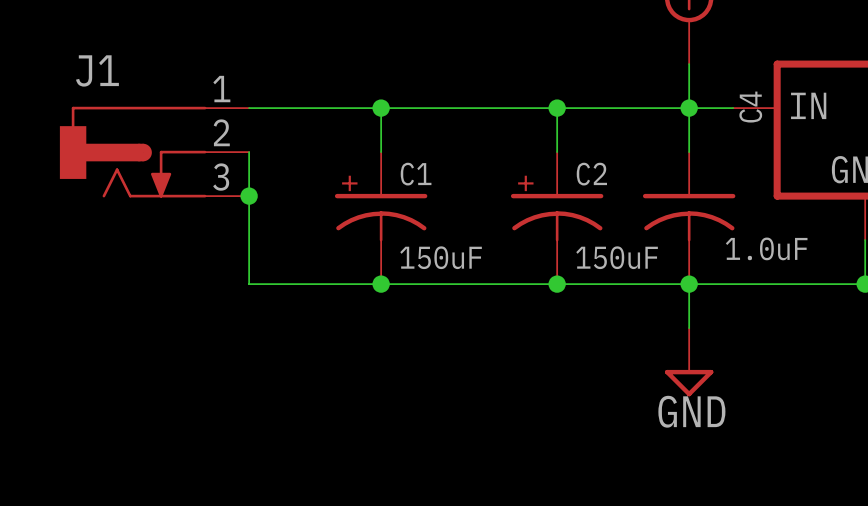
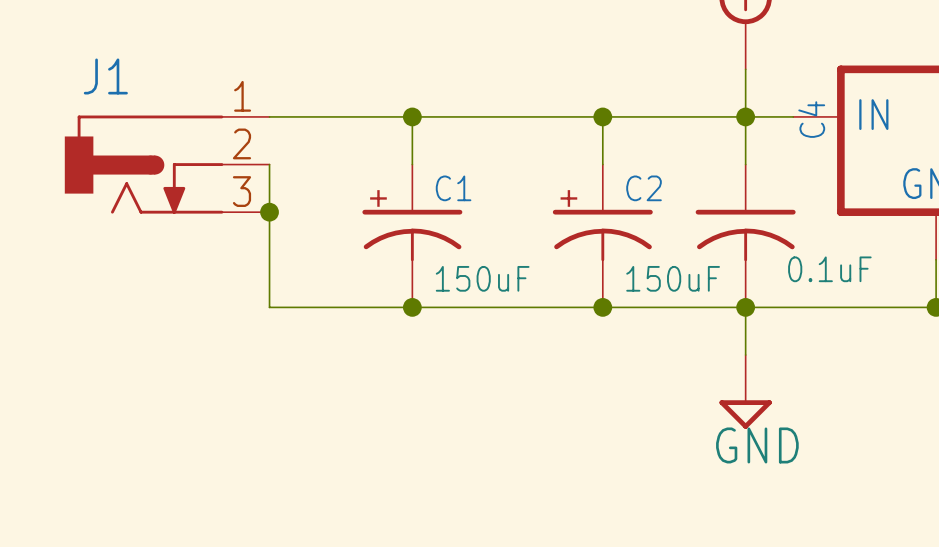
C4 value: 1.0uF (766, 248) -> 0.1uF (829, 269)

